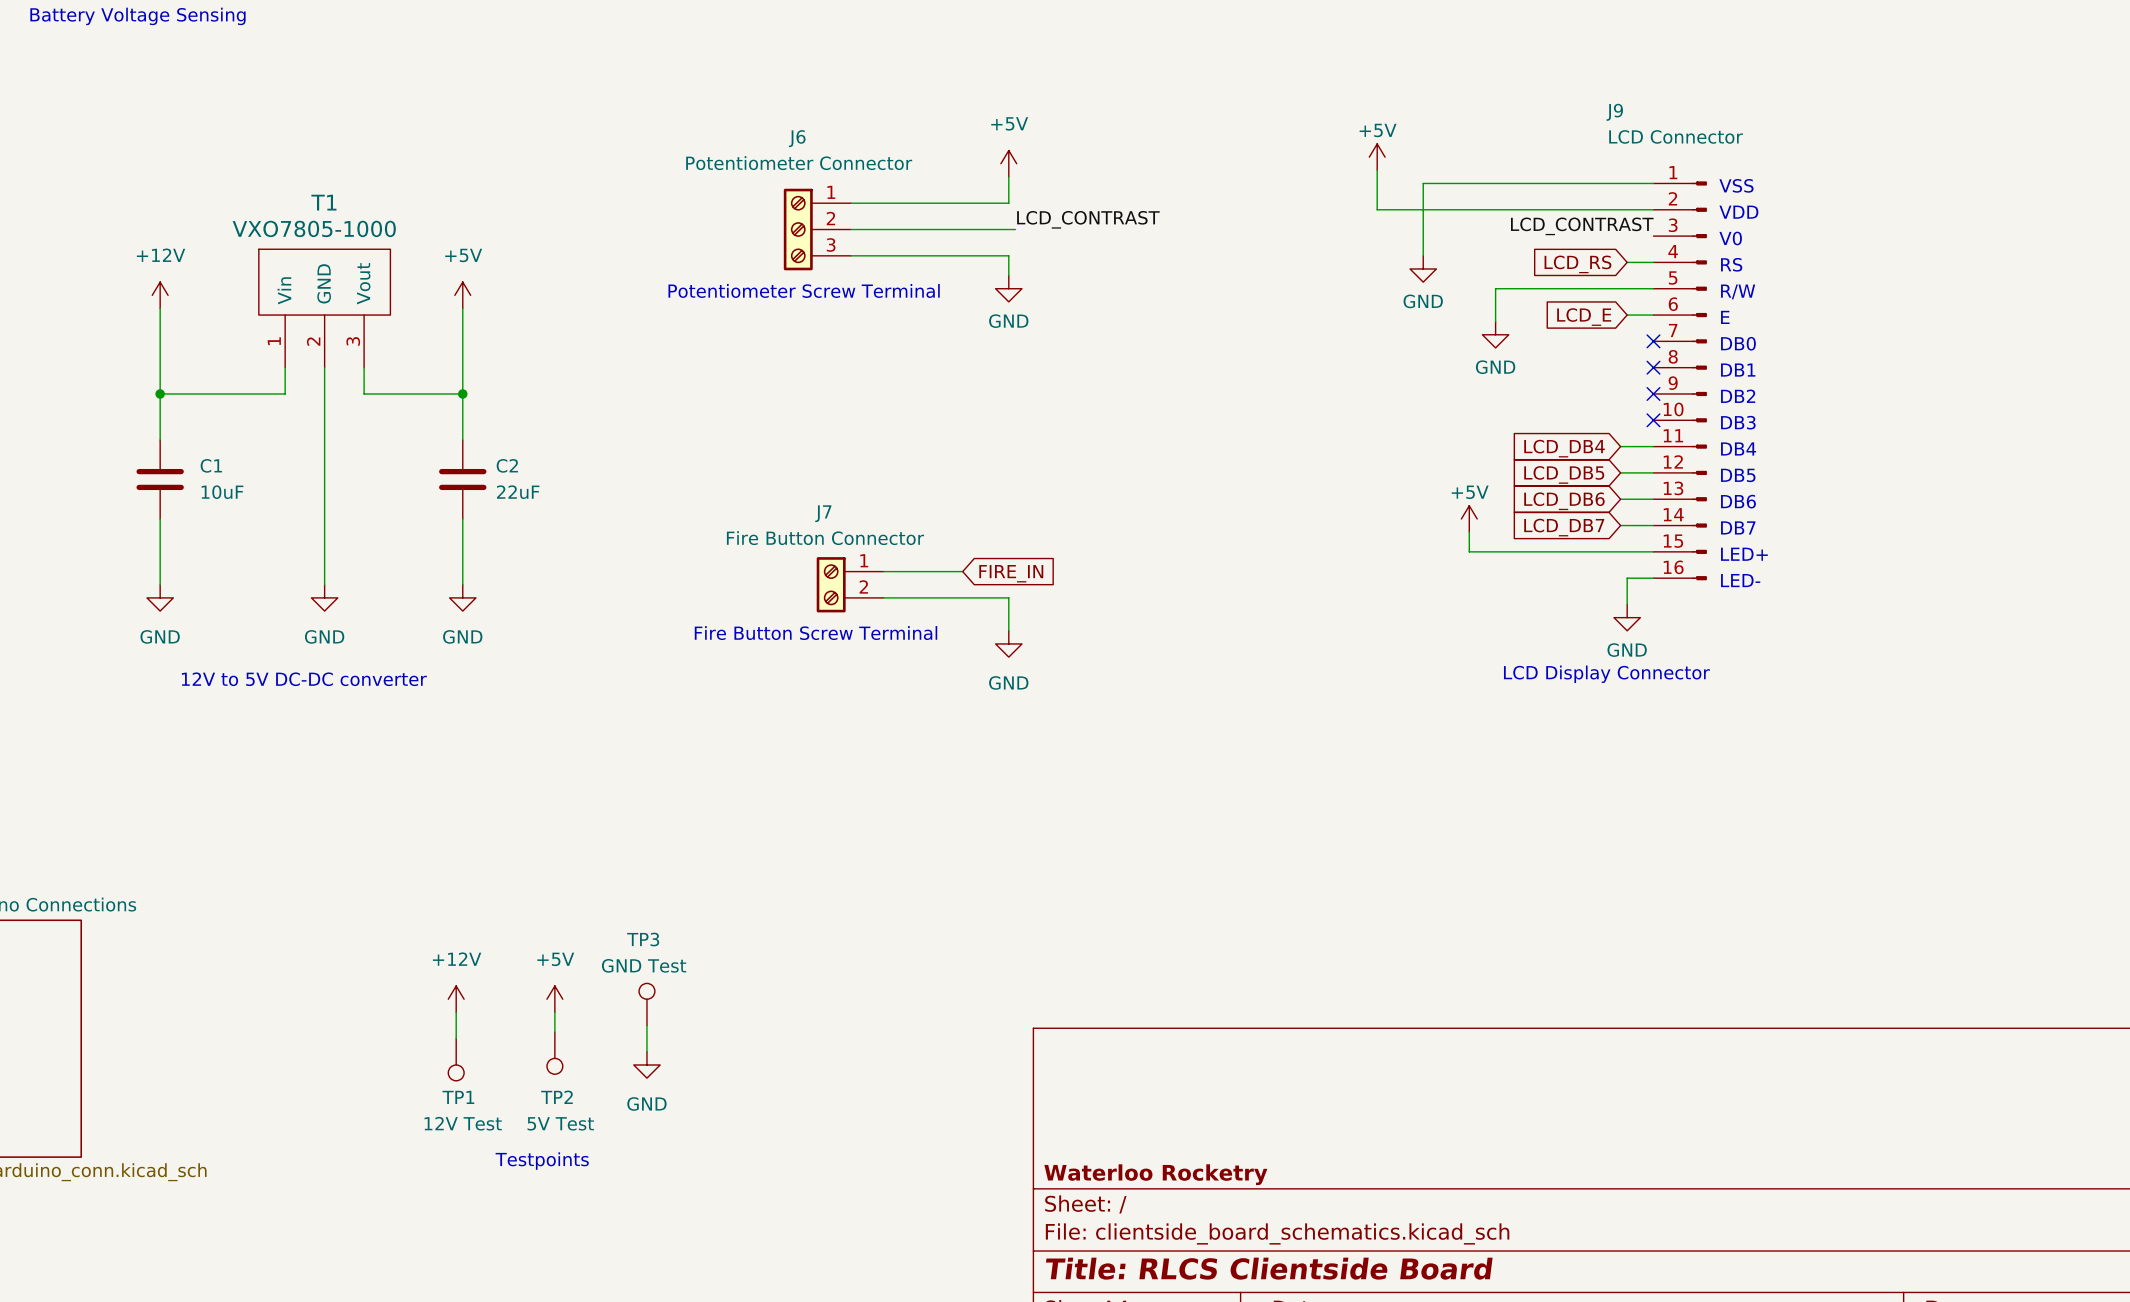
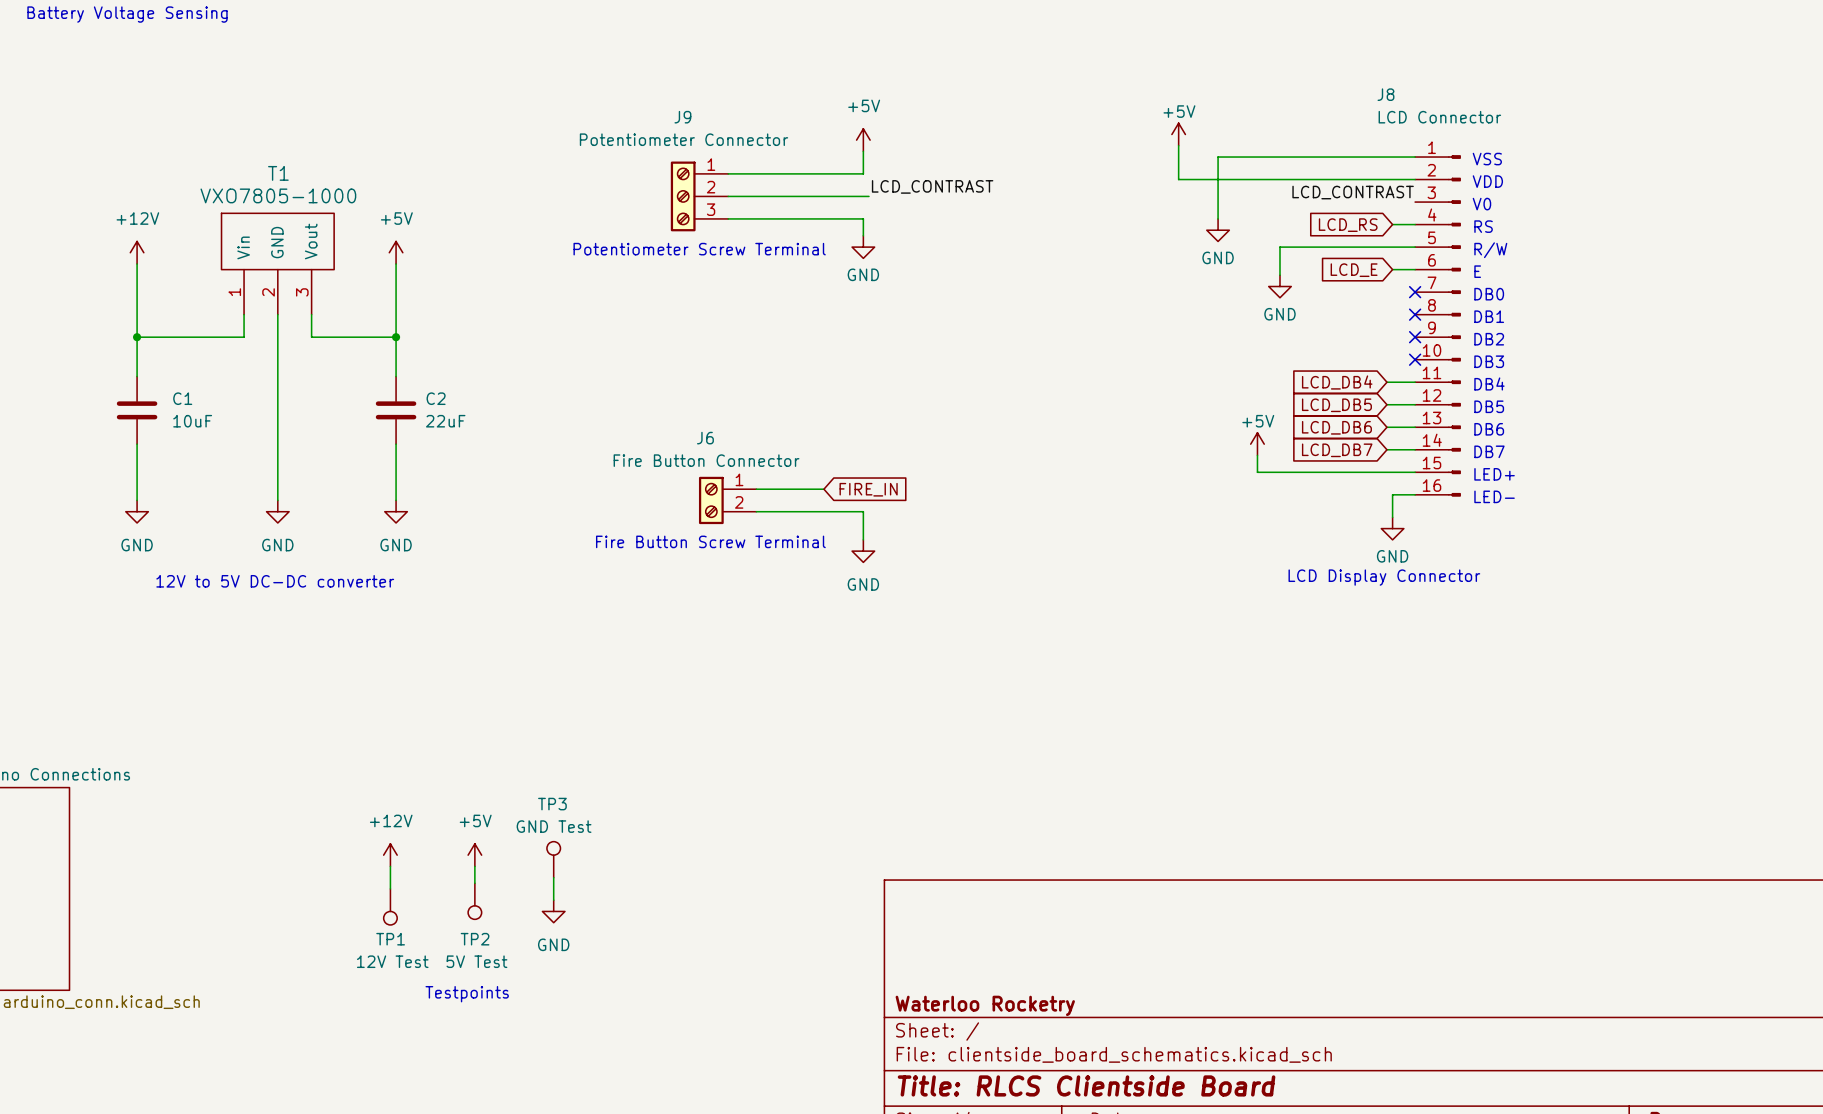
J9 name: J9 (1614, 112) -> J8 (1385, 94)
J6 name: J6 (797, 138) -> J9 (682, 117)
J7 name: J7 (823, 513) -> J6 (705, 438)

